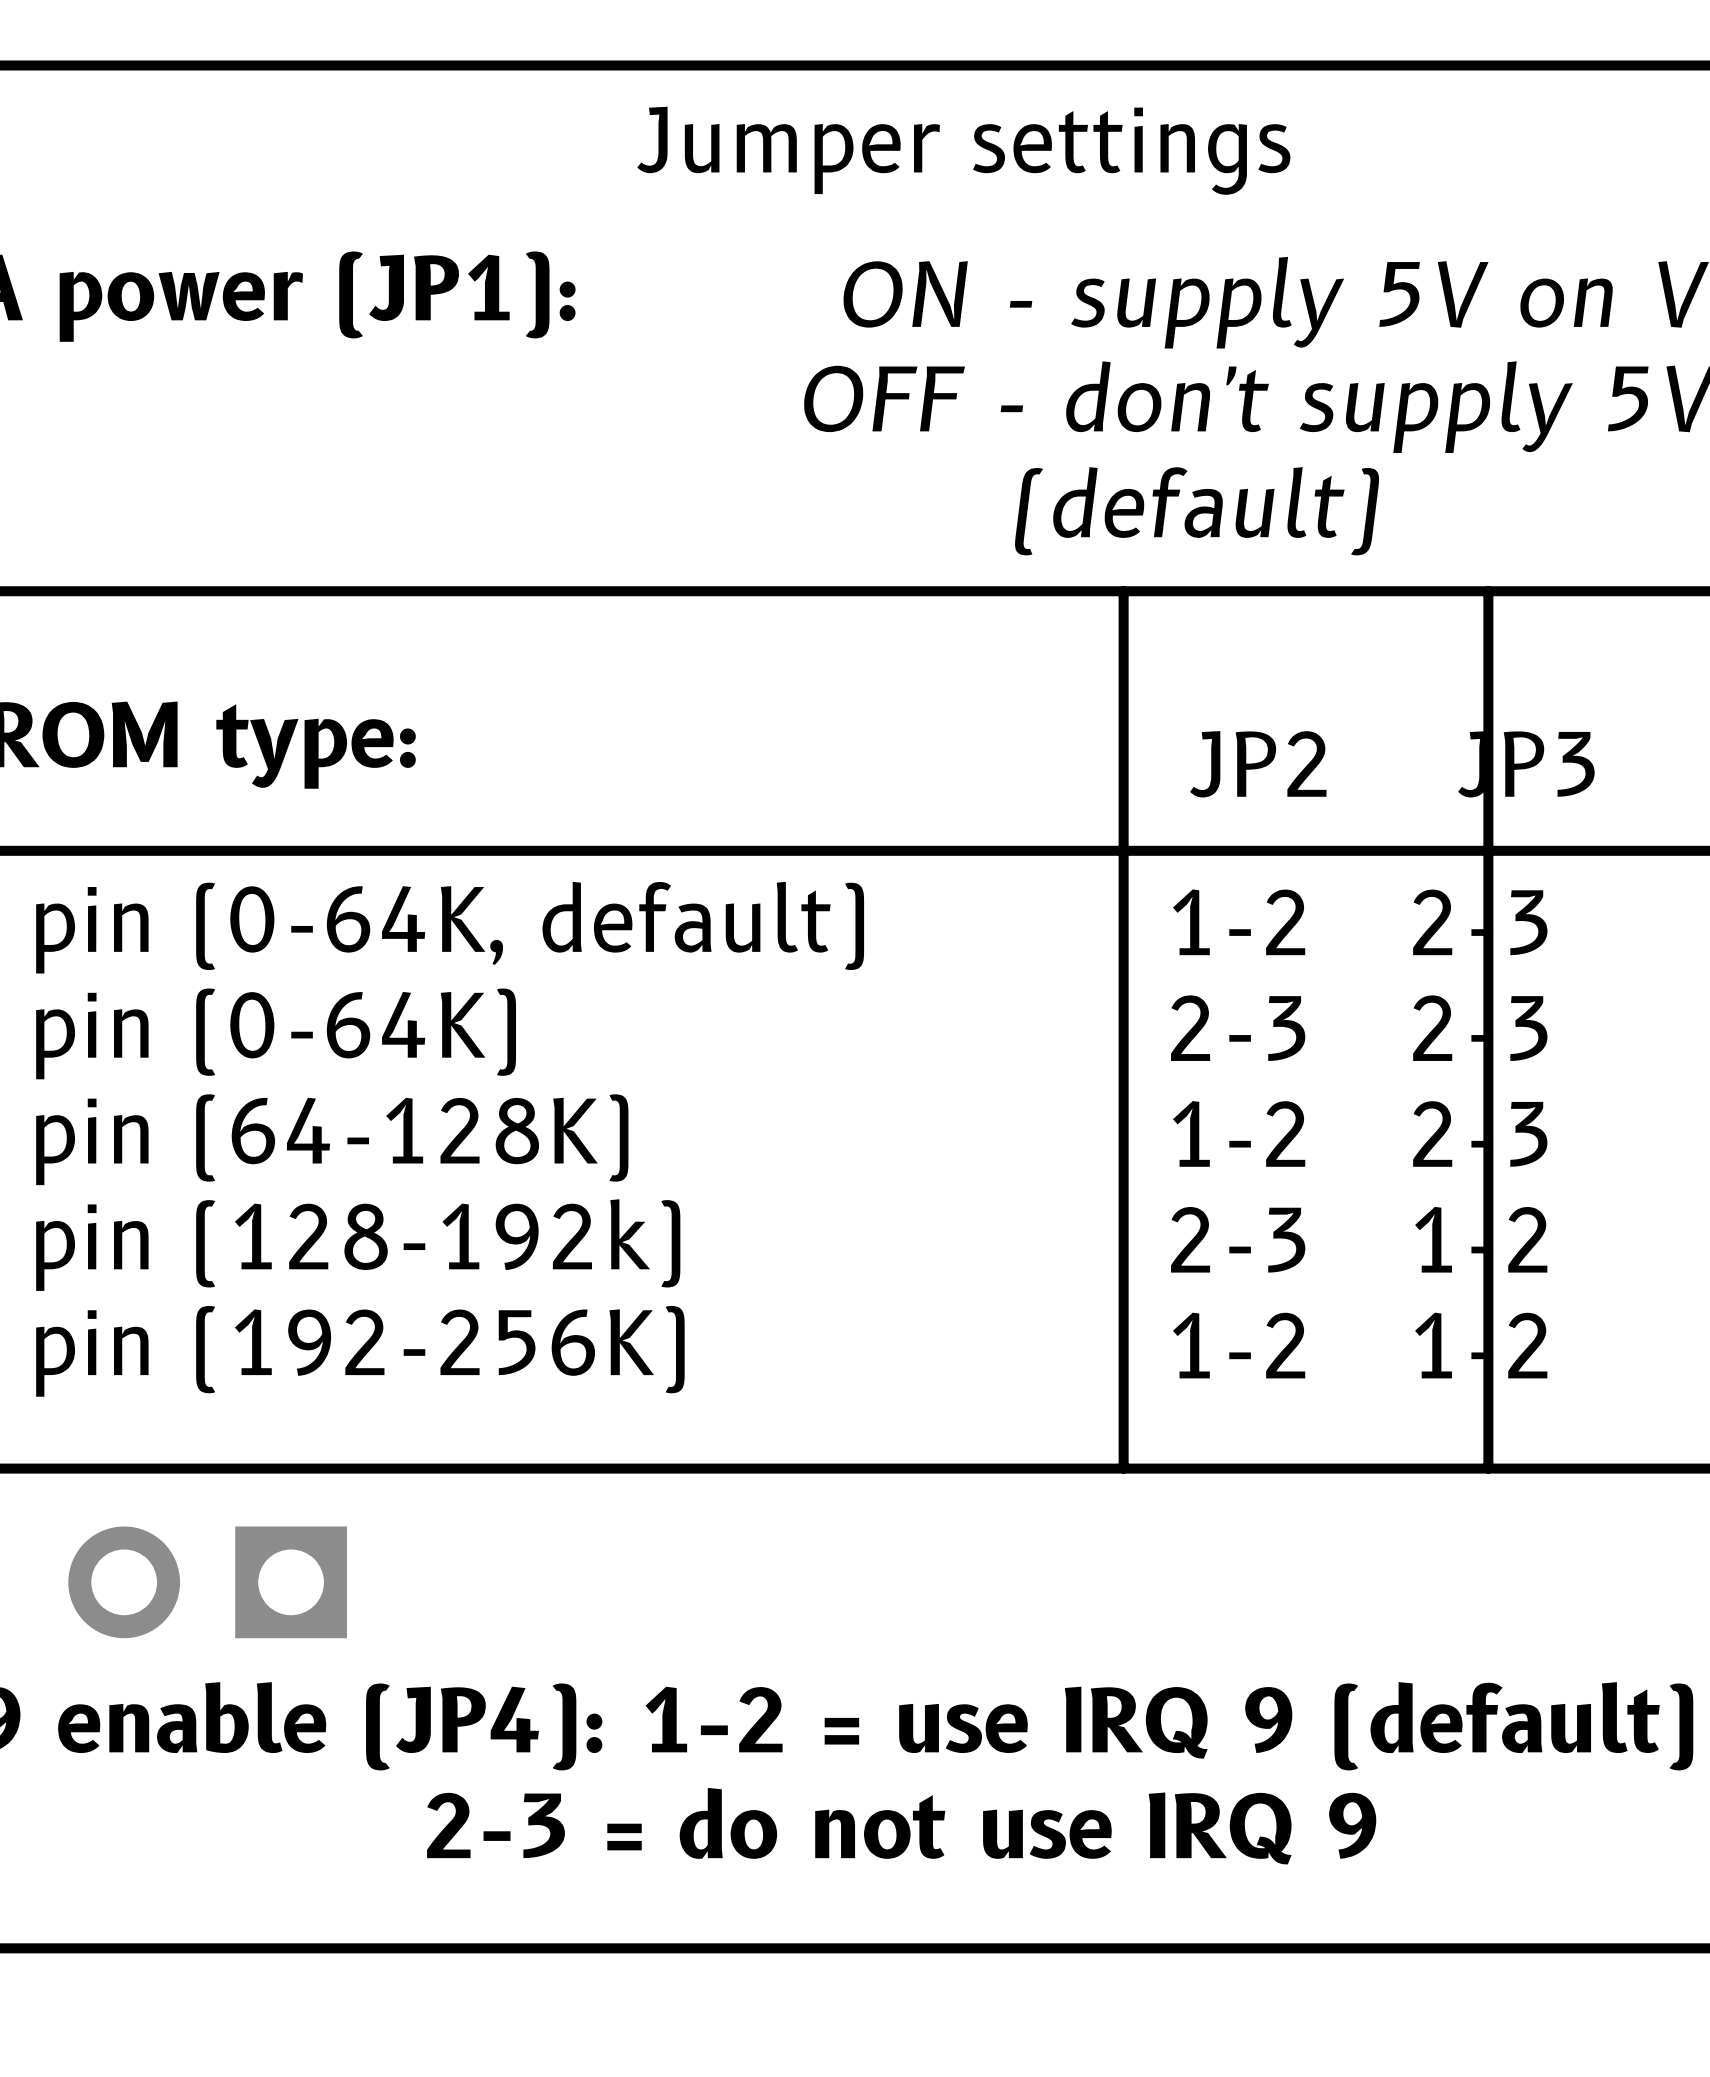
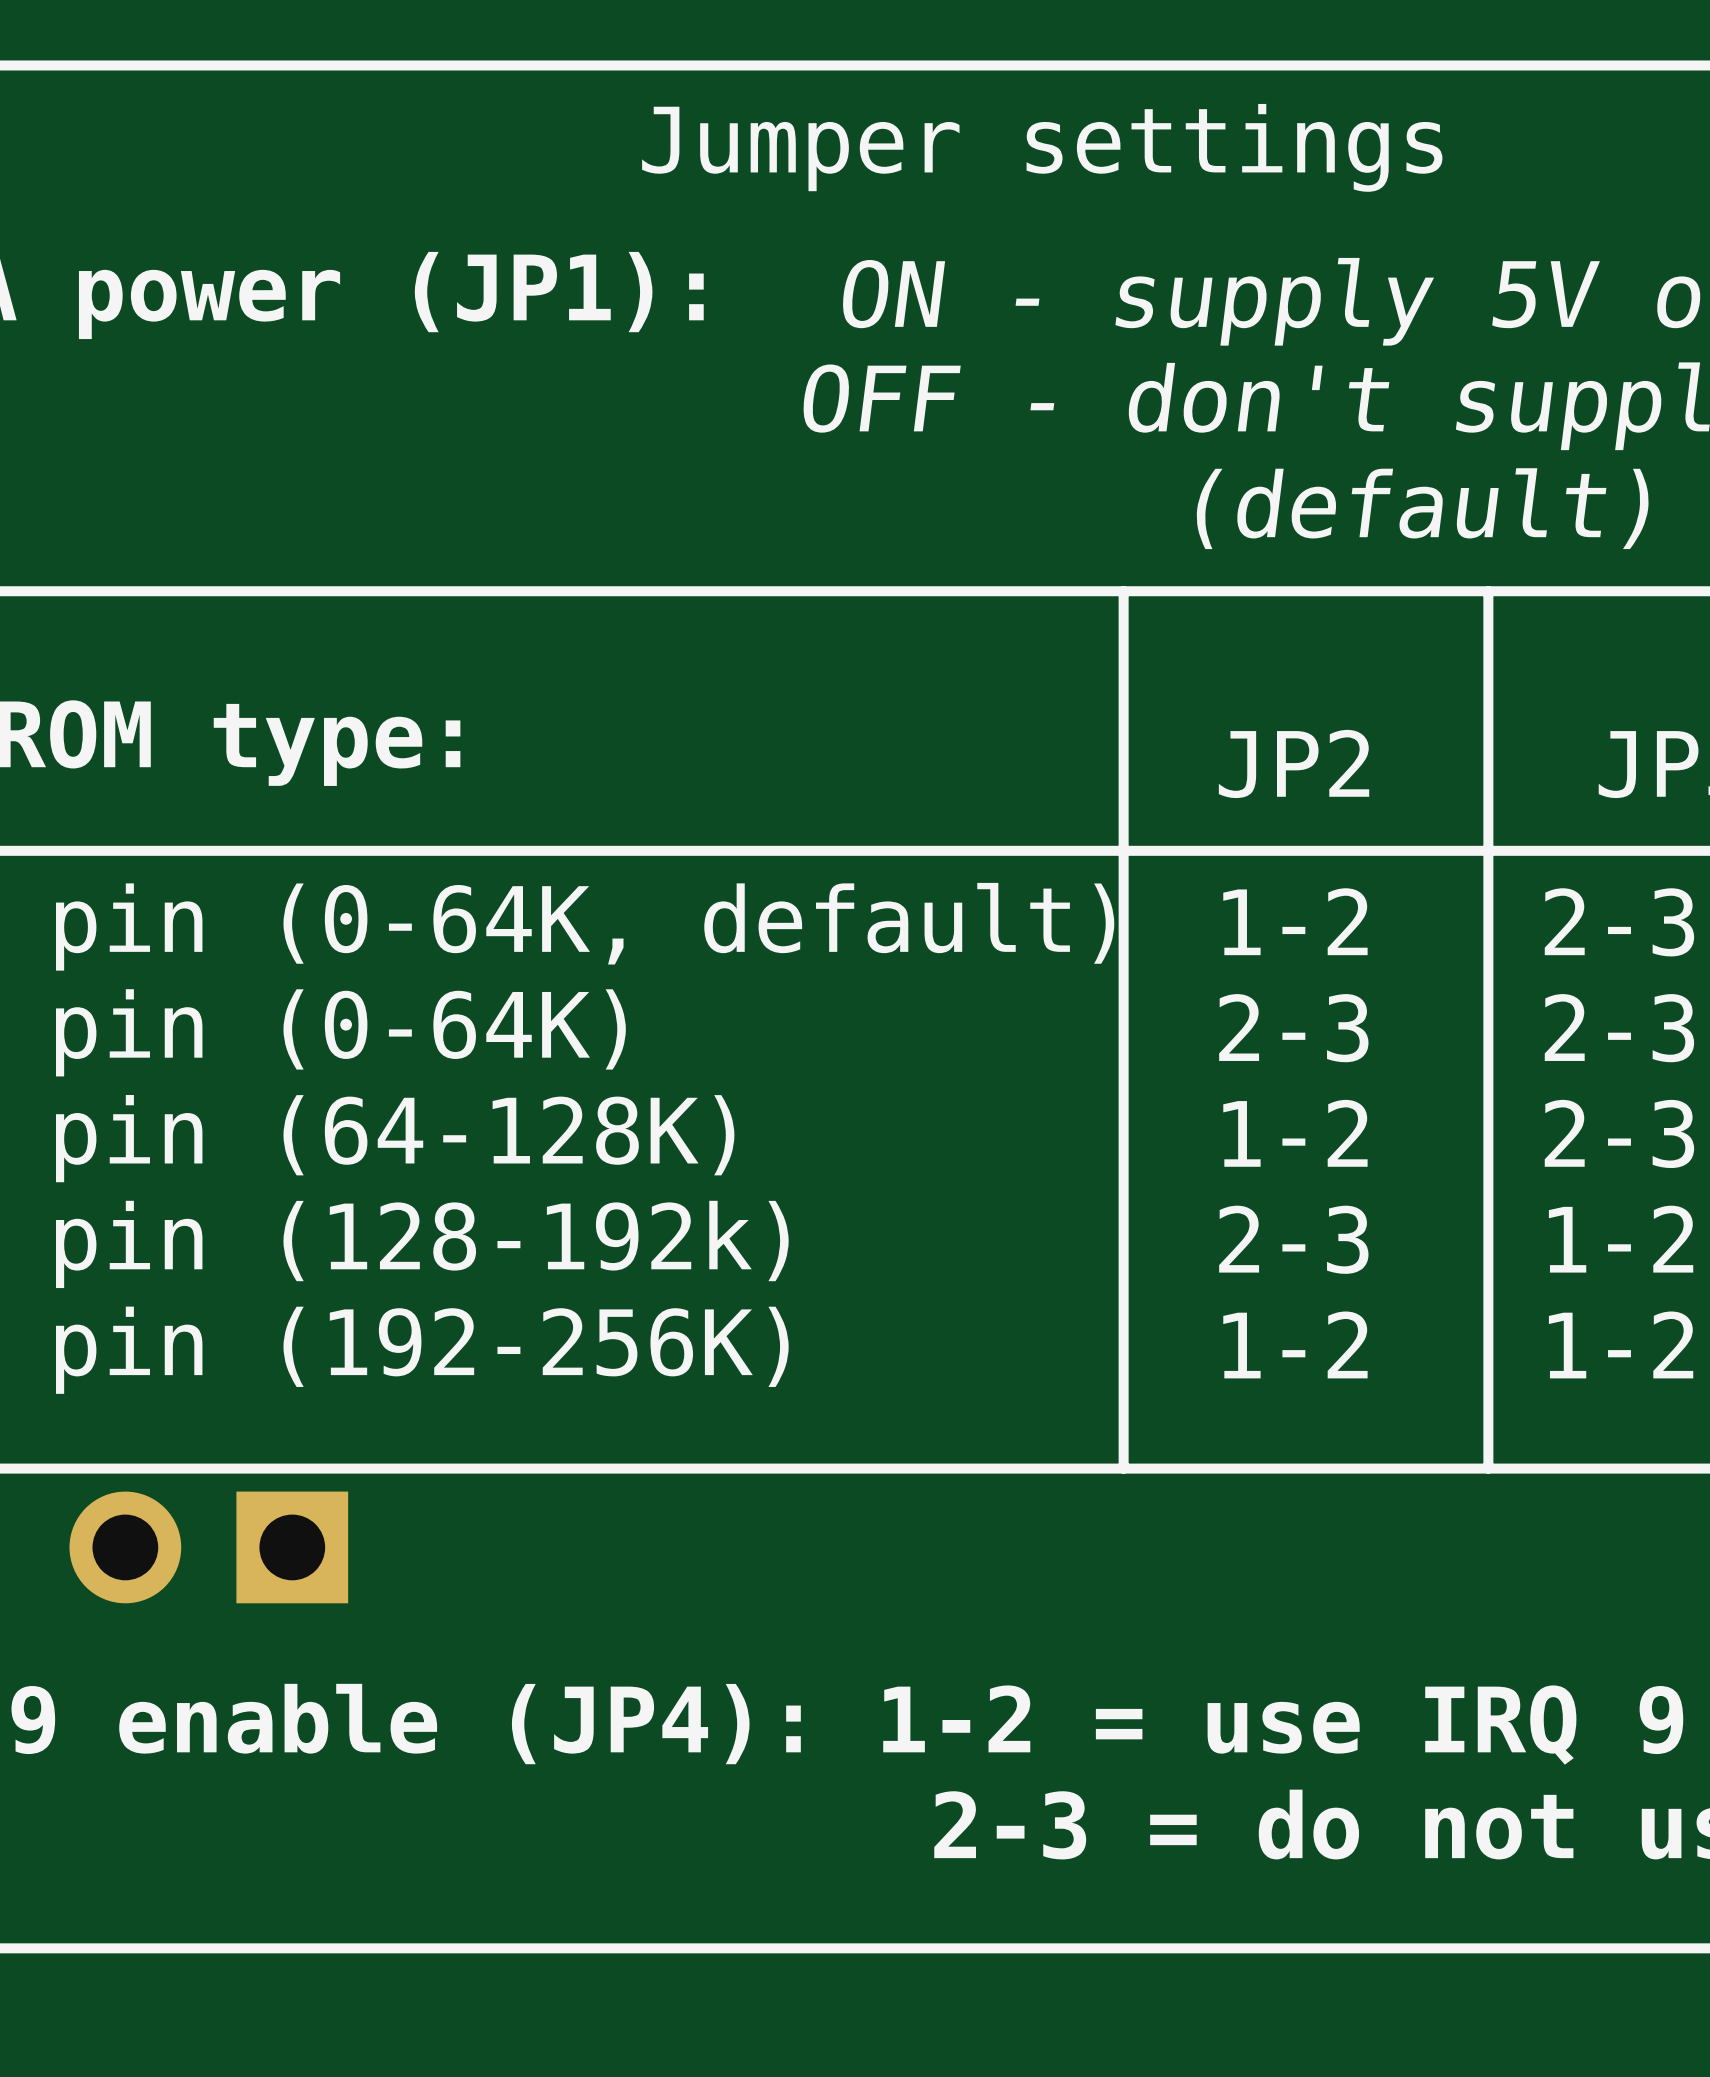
part position: (207, 1582) -> (208, 1547)

